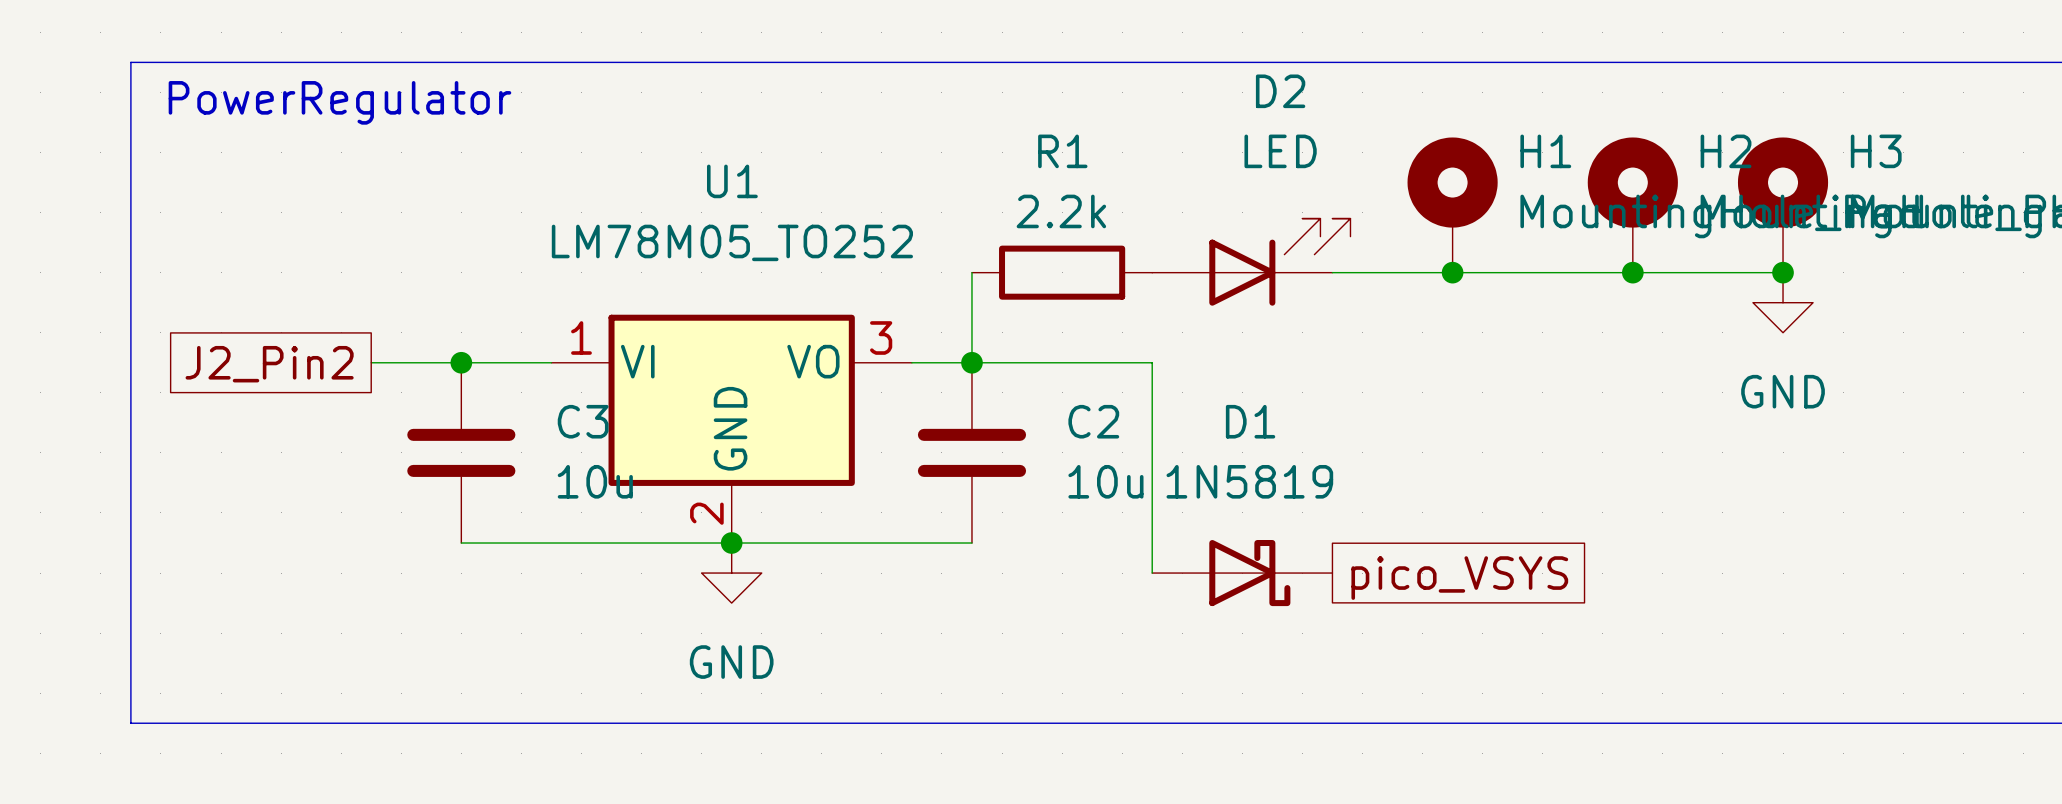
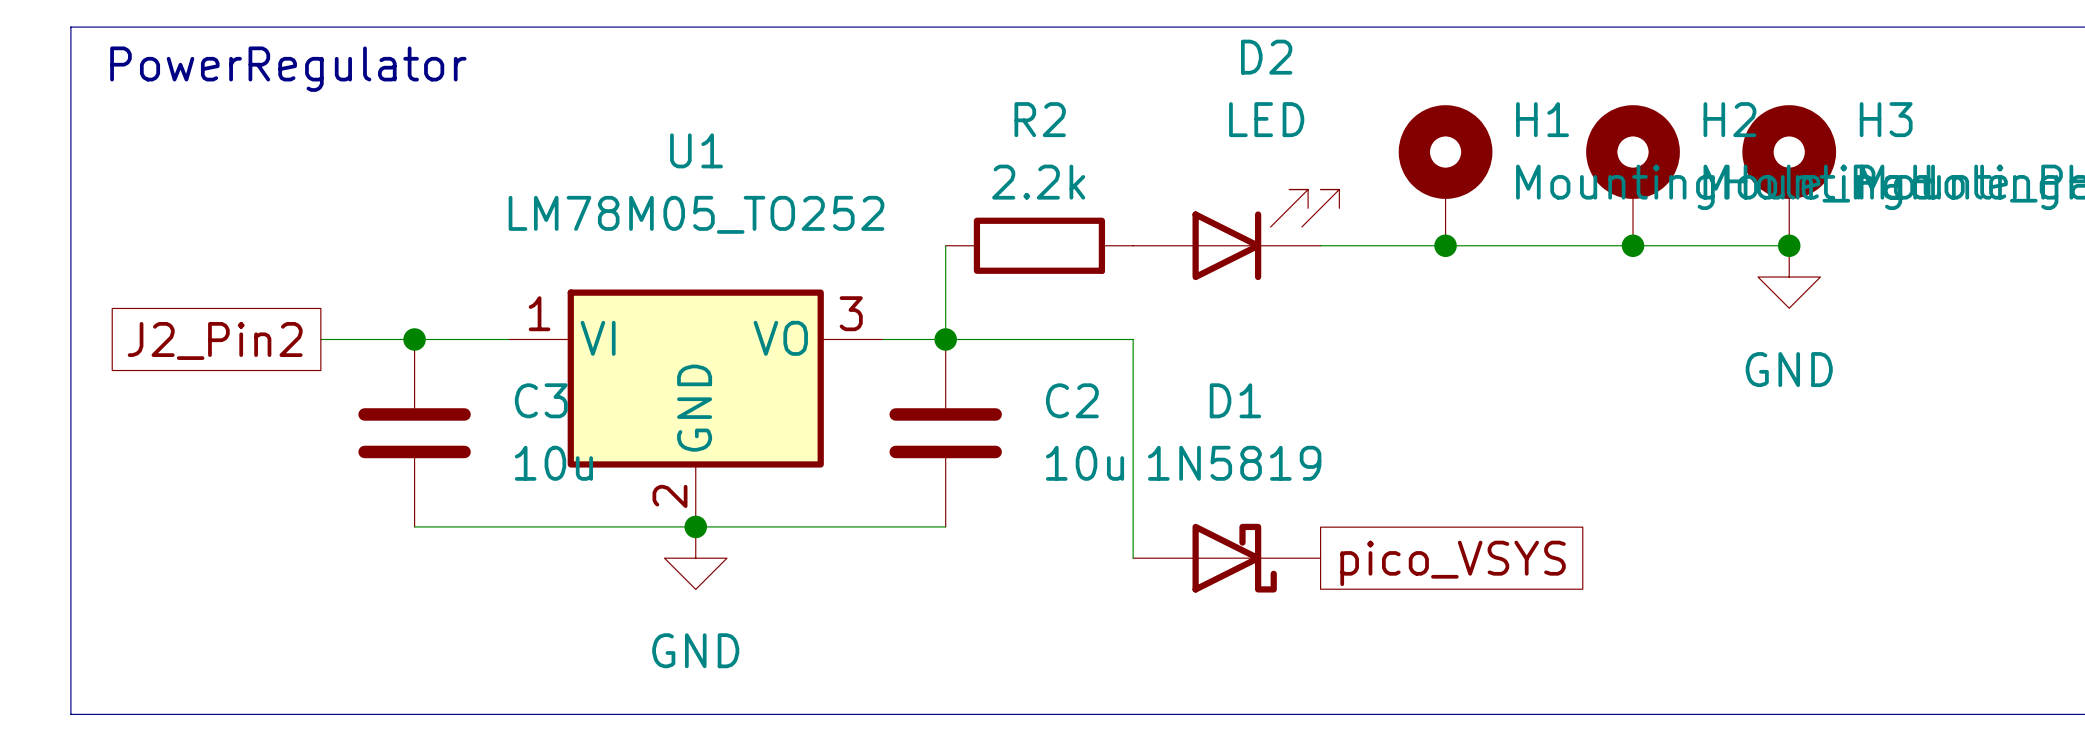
R1 name: R1 (1062, 151) -> R2 (1040, 119)

